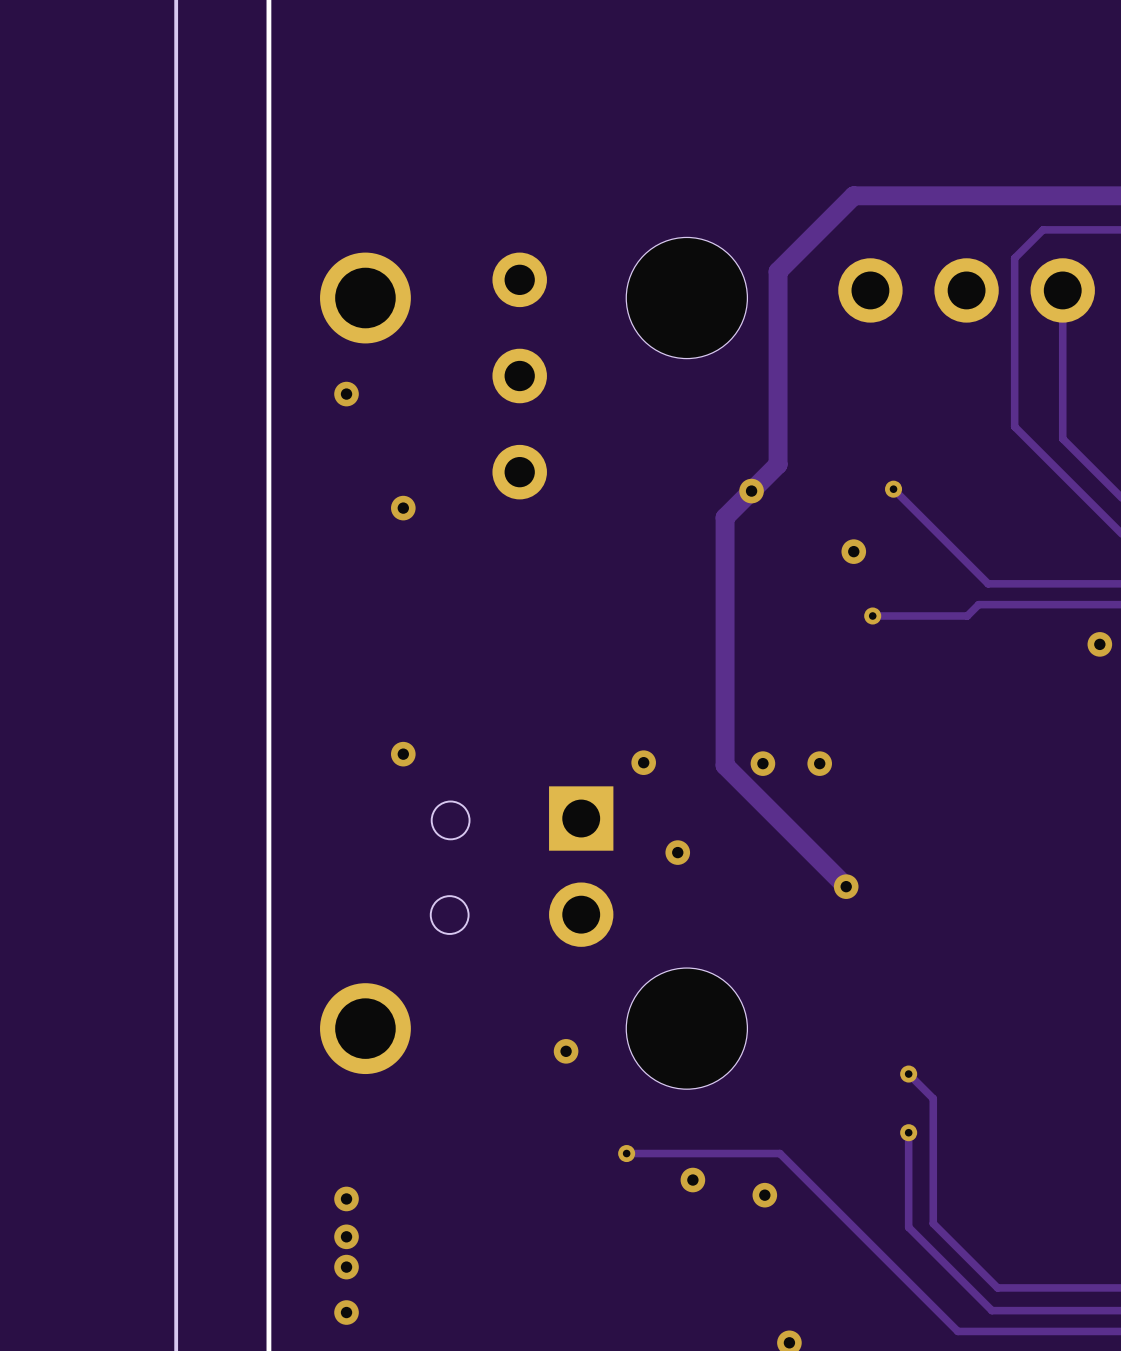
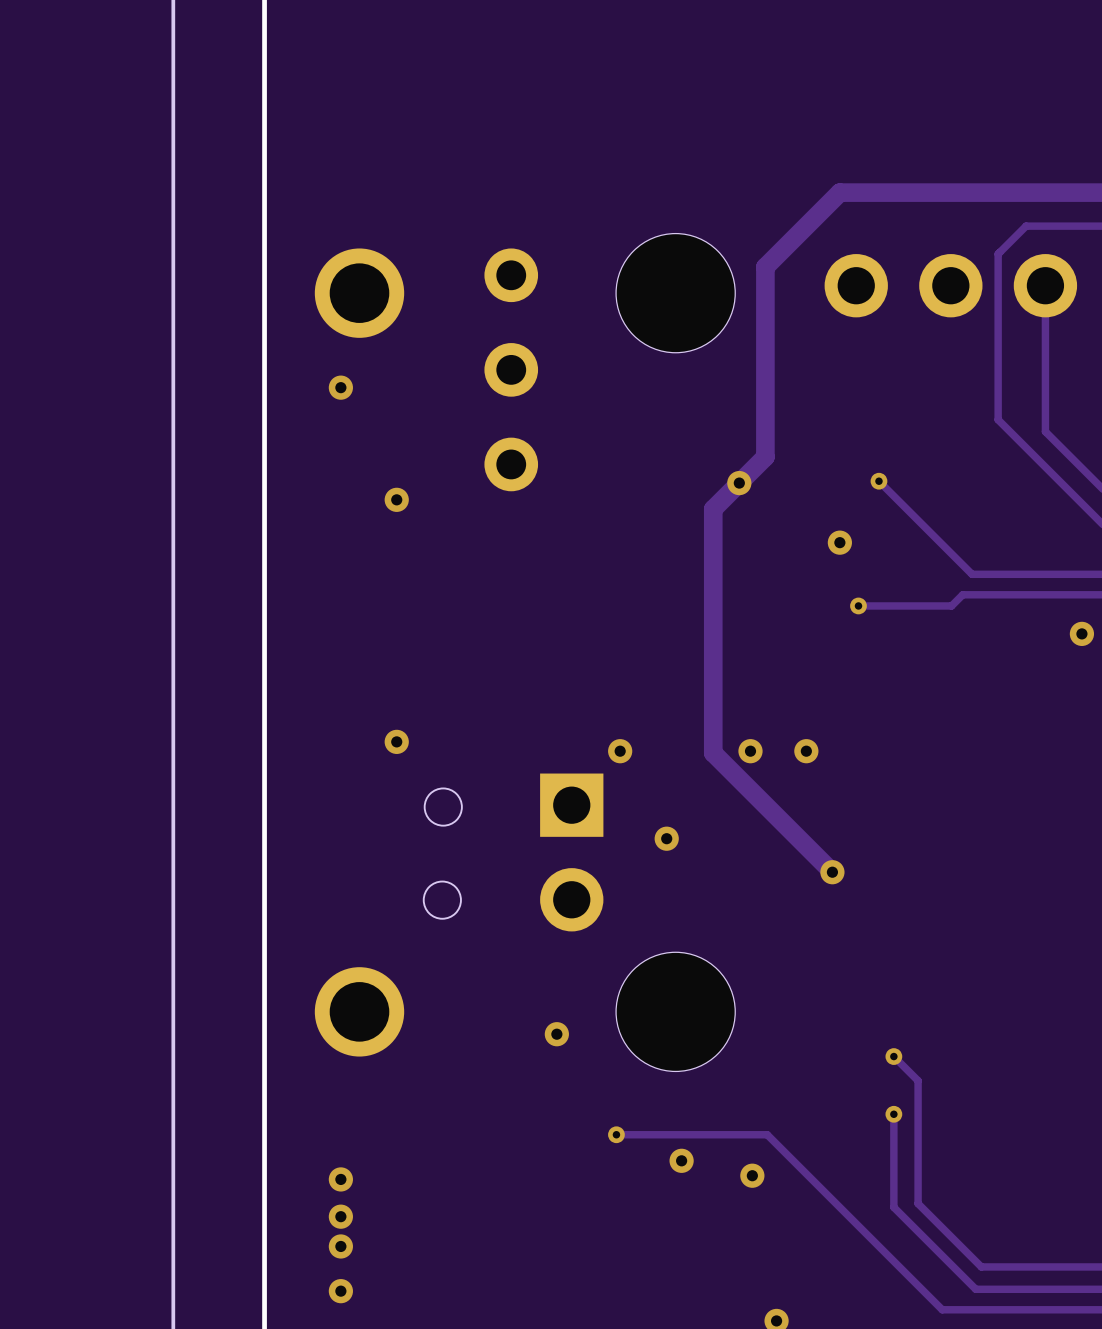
via position: (643, 762) -> (620, 751)

